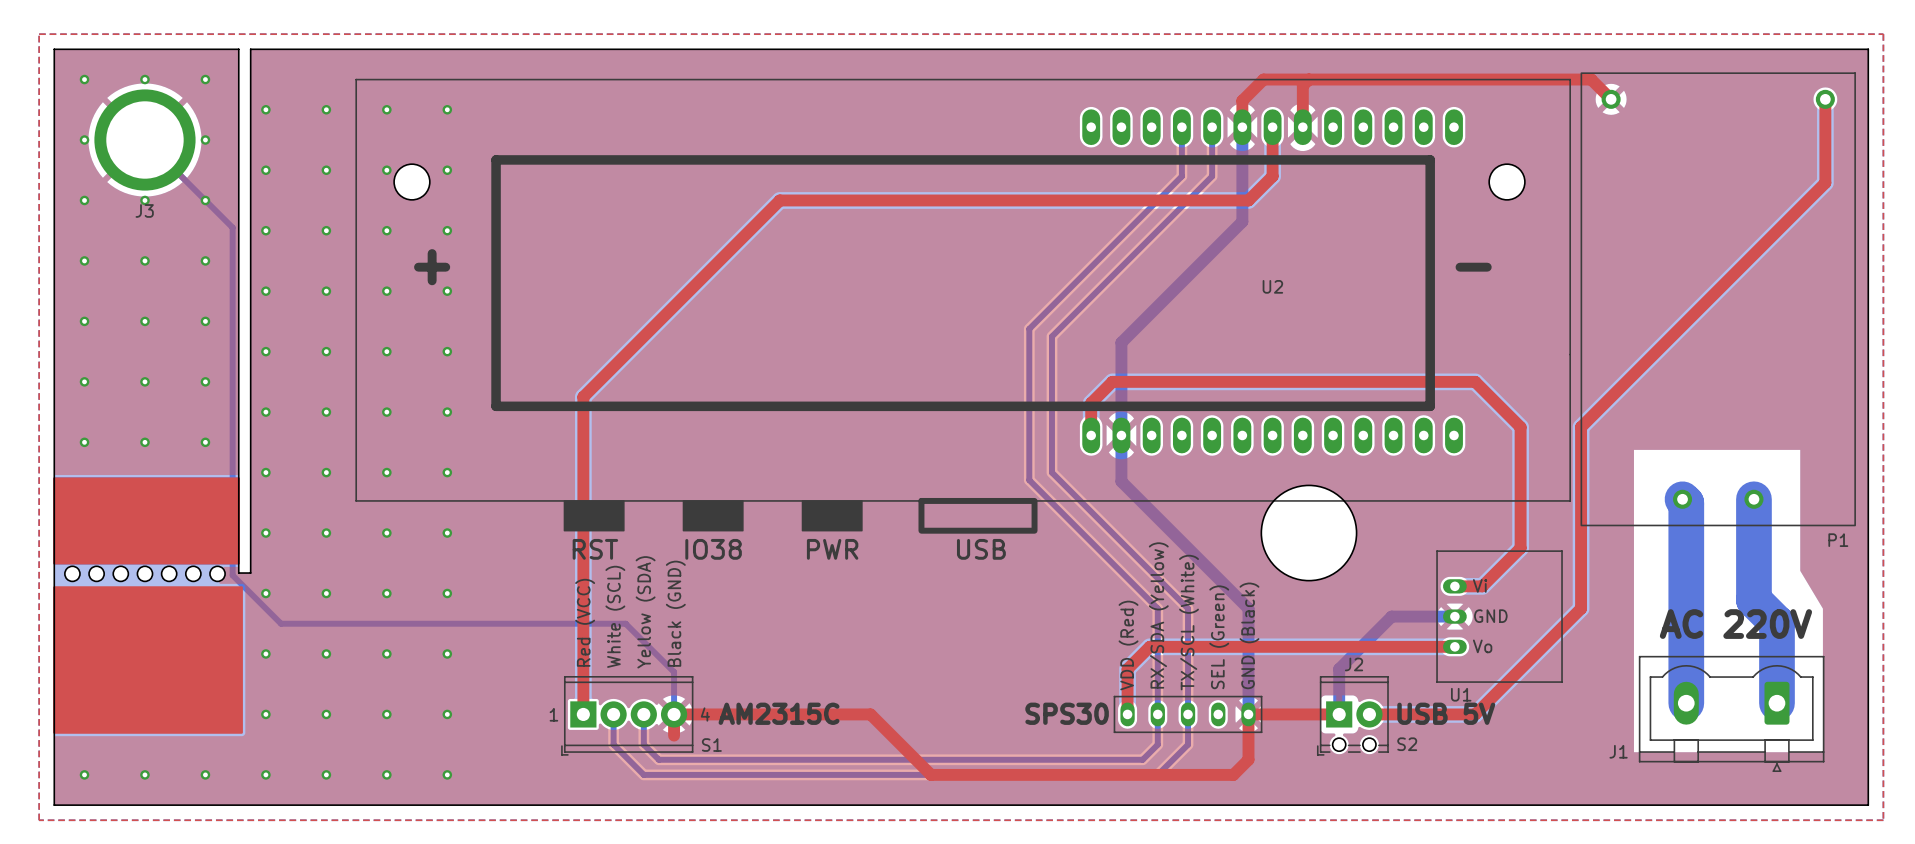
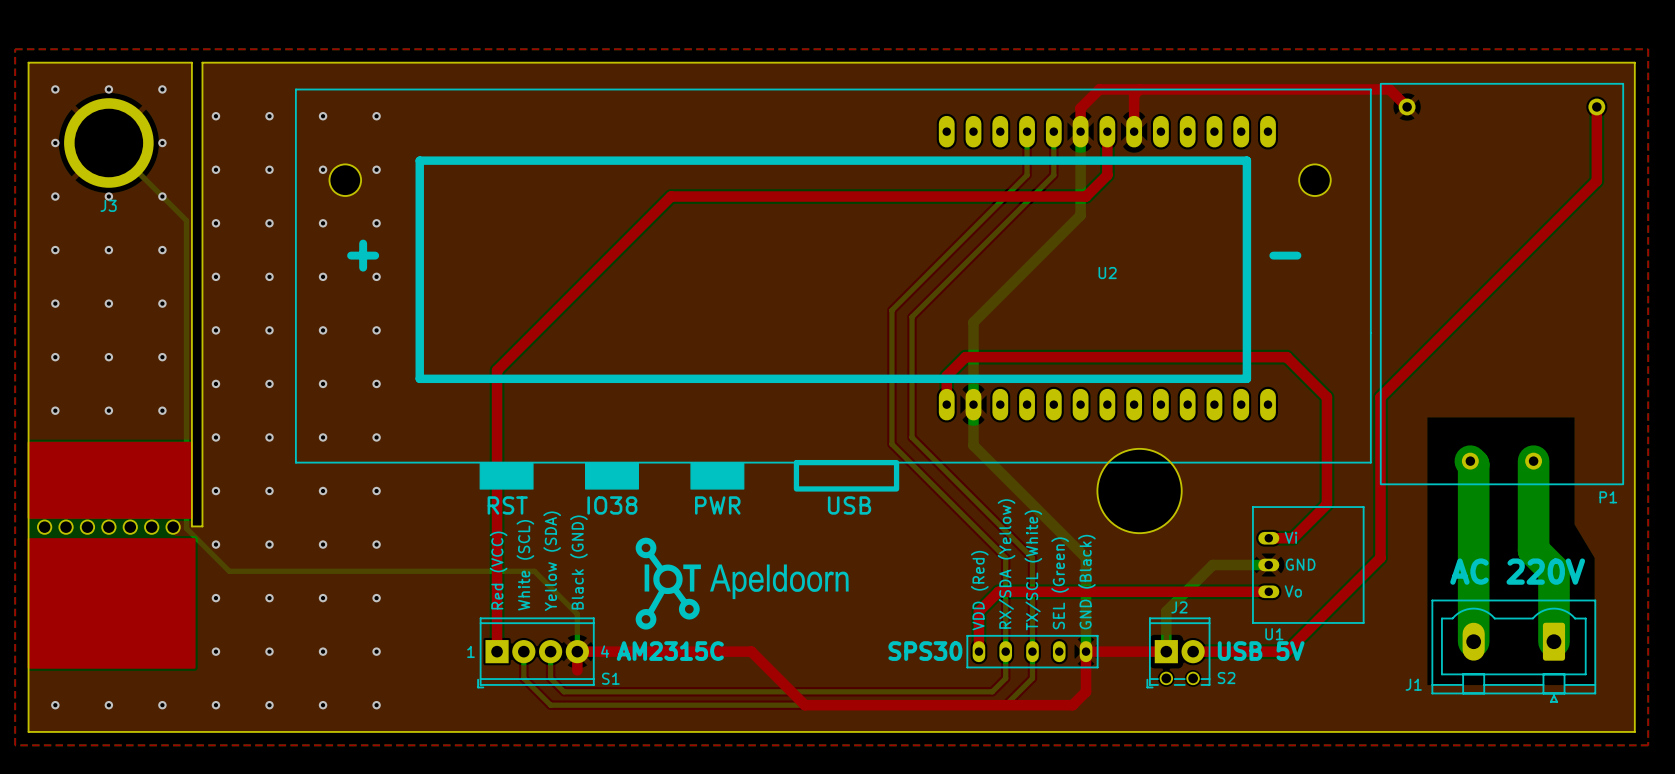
drawing: none -> [635, 537, 849, 630]

